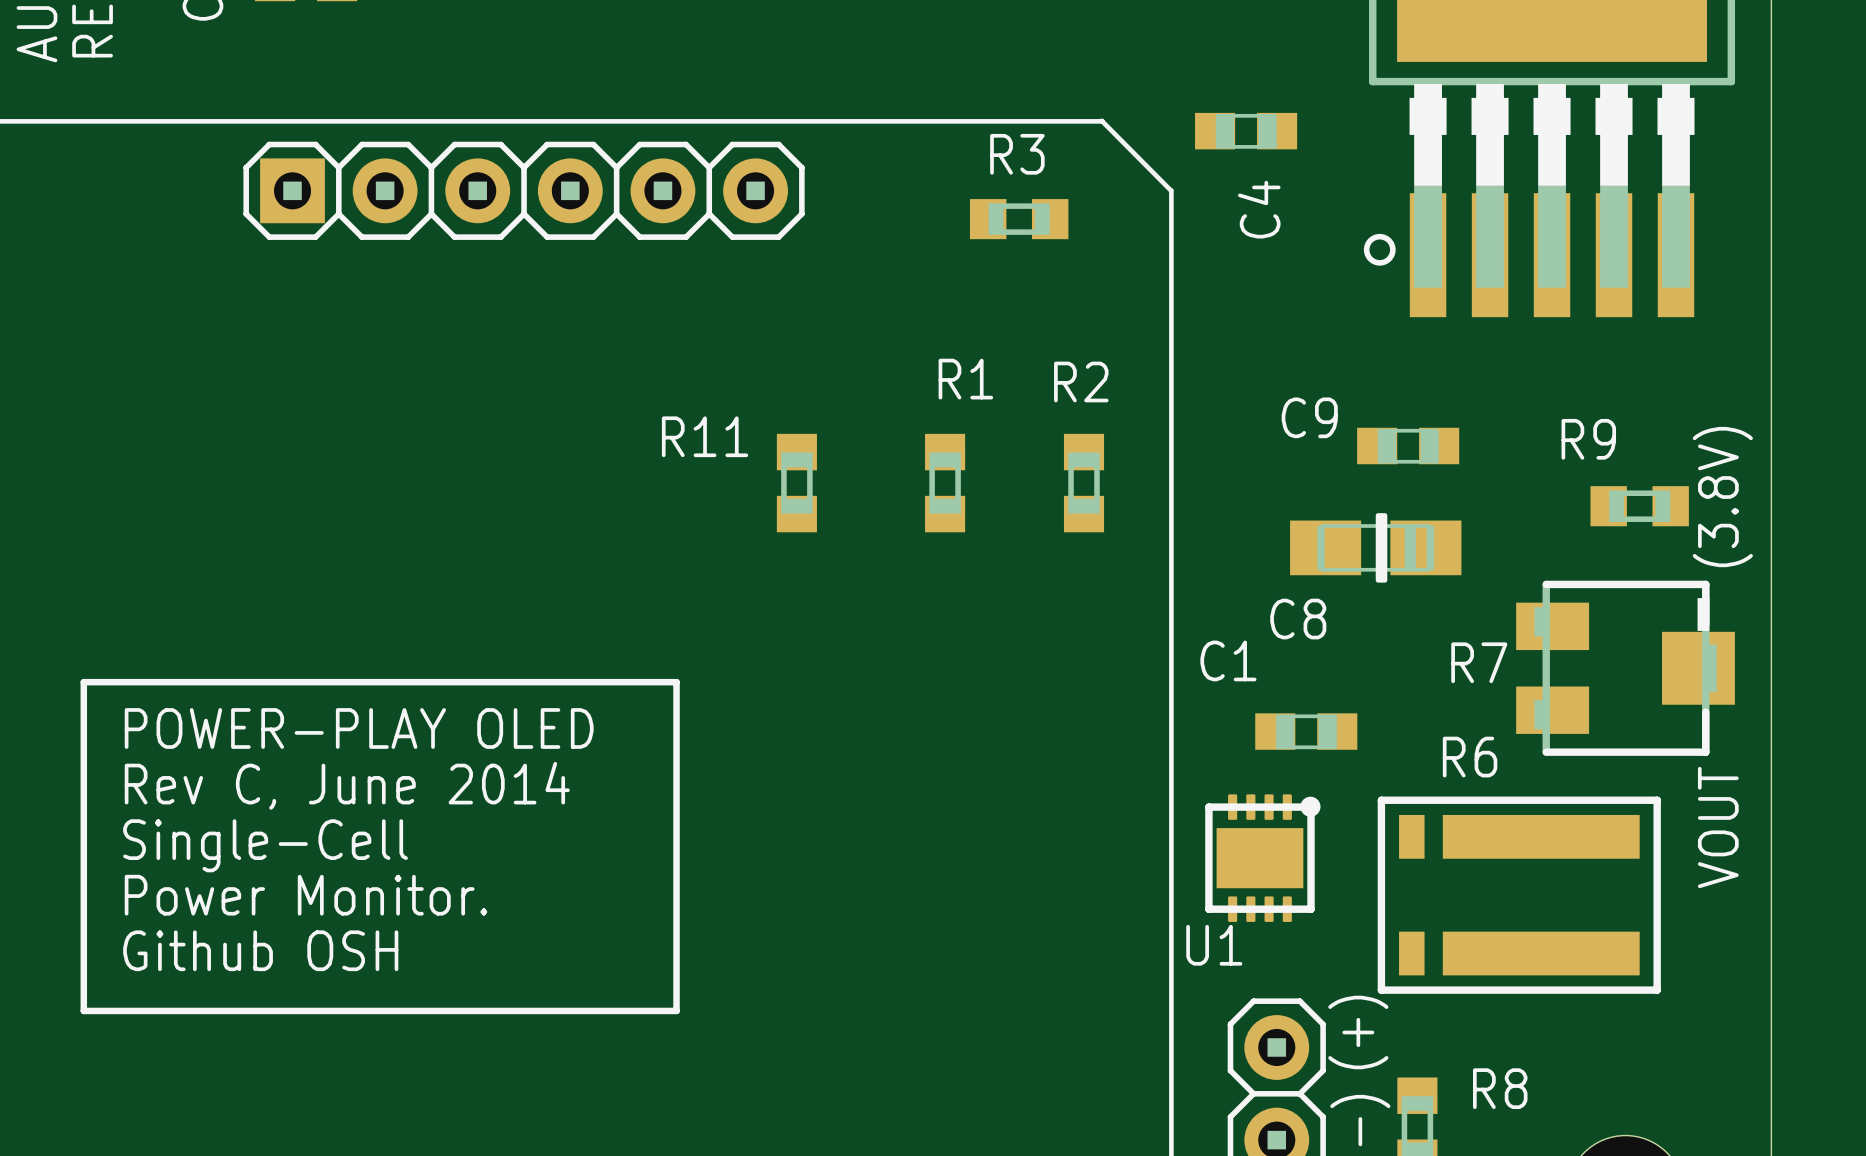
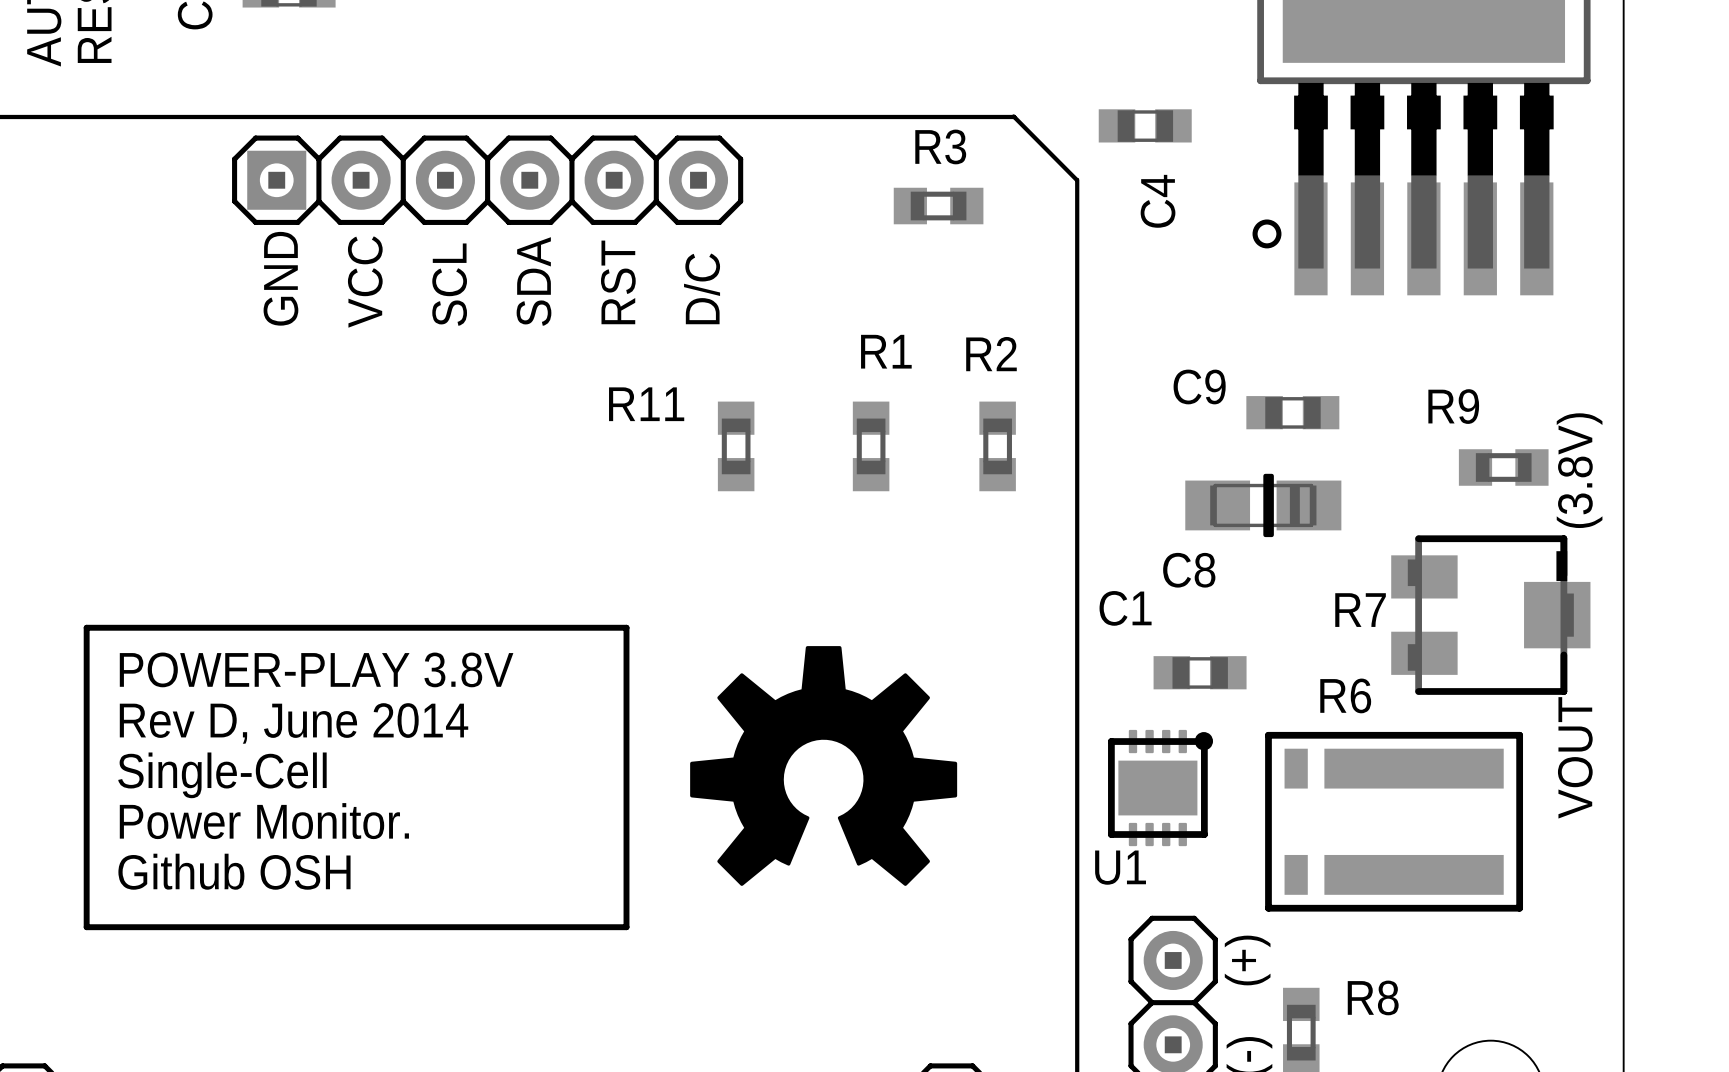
part text: none -> D/C (702, 288)
part text: none -> GND (280, 278)
part text: none -> SCL (449, 284)
part text: none -> SDA (534, 281)
part text: none -> RST (618, 282)
part text: none -> VCC (365, 282)
drawing: none -> [690, 646, 958, 886]
text: POWER-PLAY OLED (359, 728) -> POWER-PLAY 3.8V (316, 669)
text: Rev C, June 2014 (347, 785) -> Rev D, June 2014 (294, 723)

